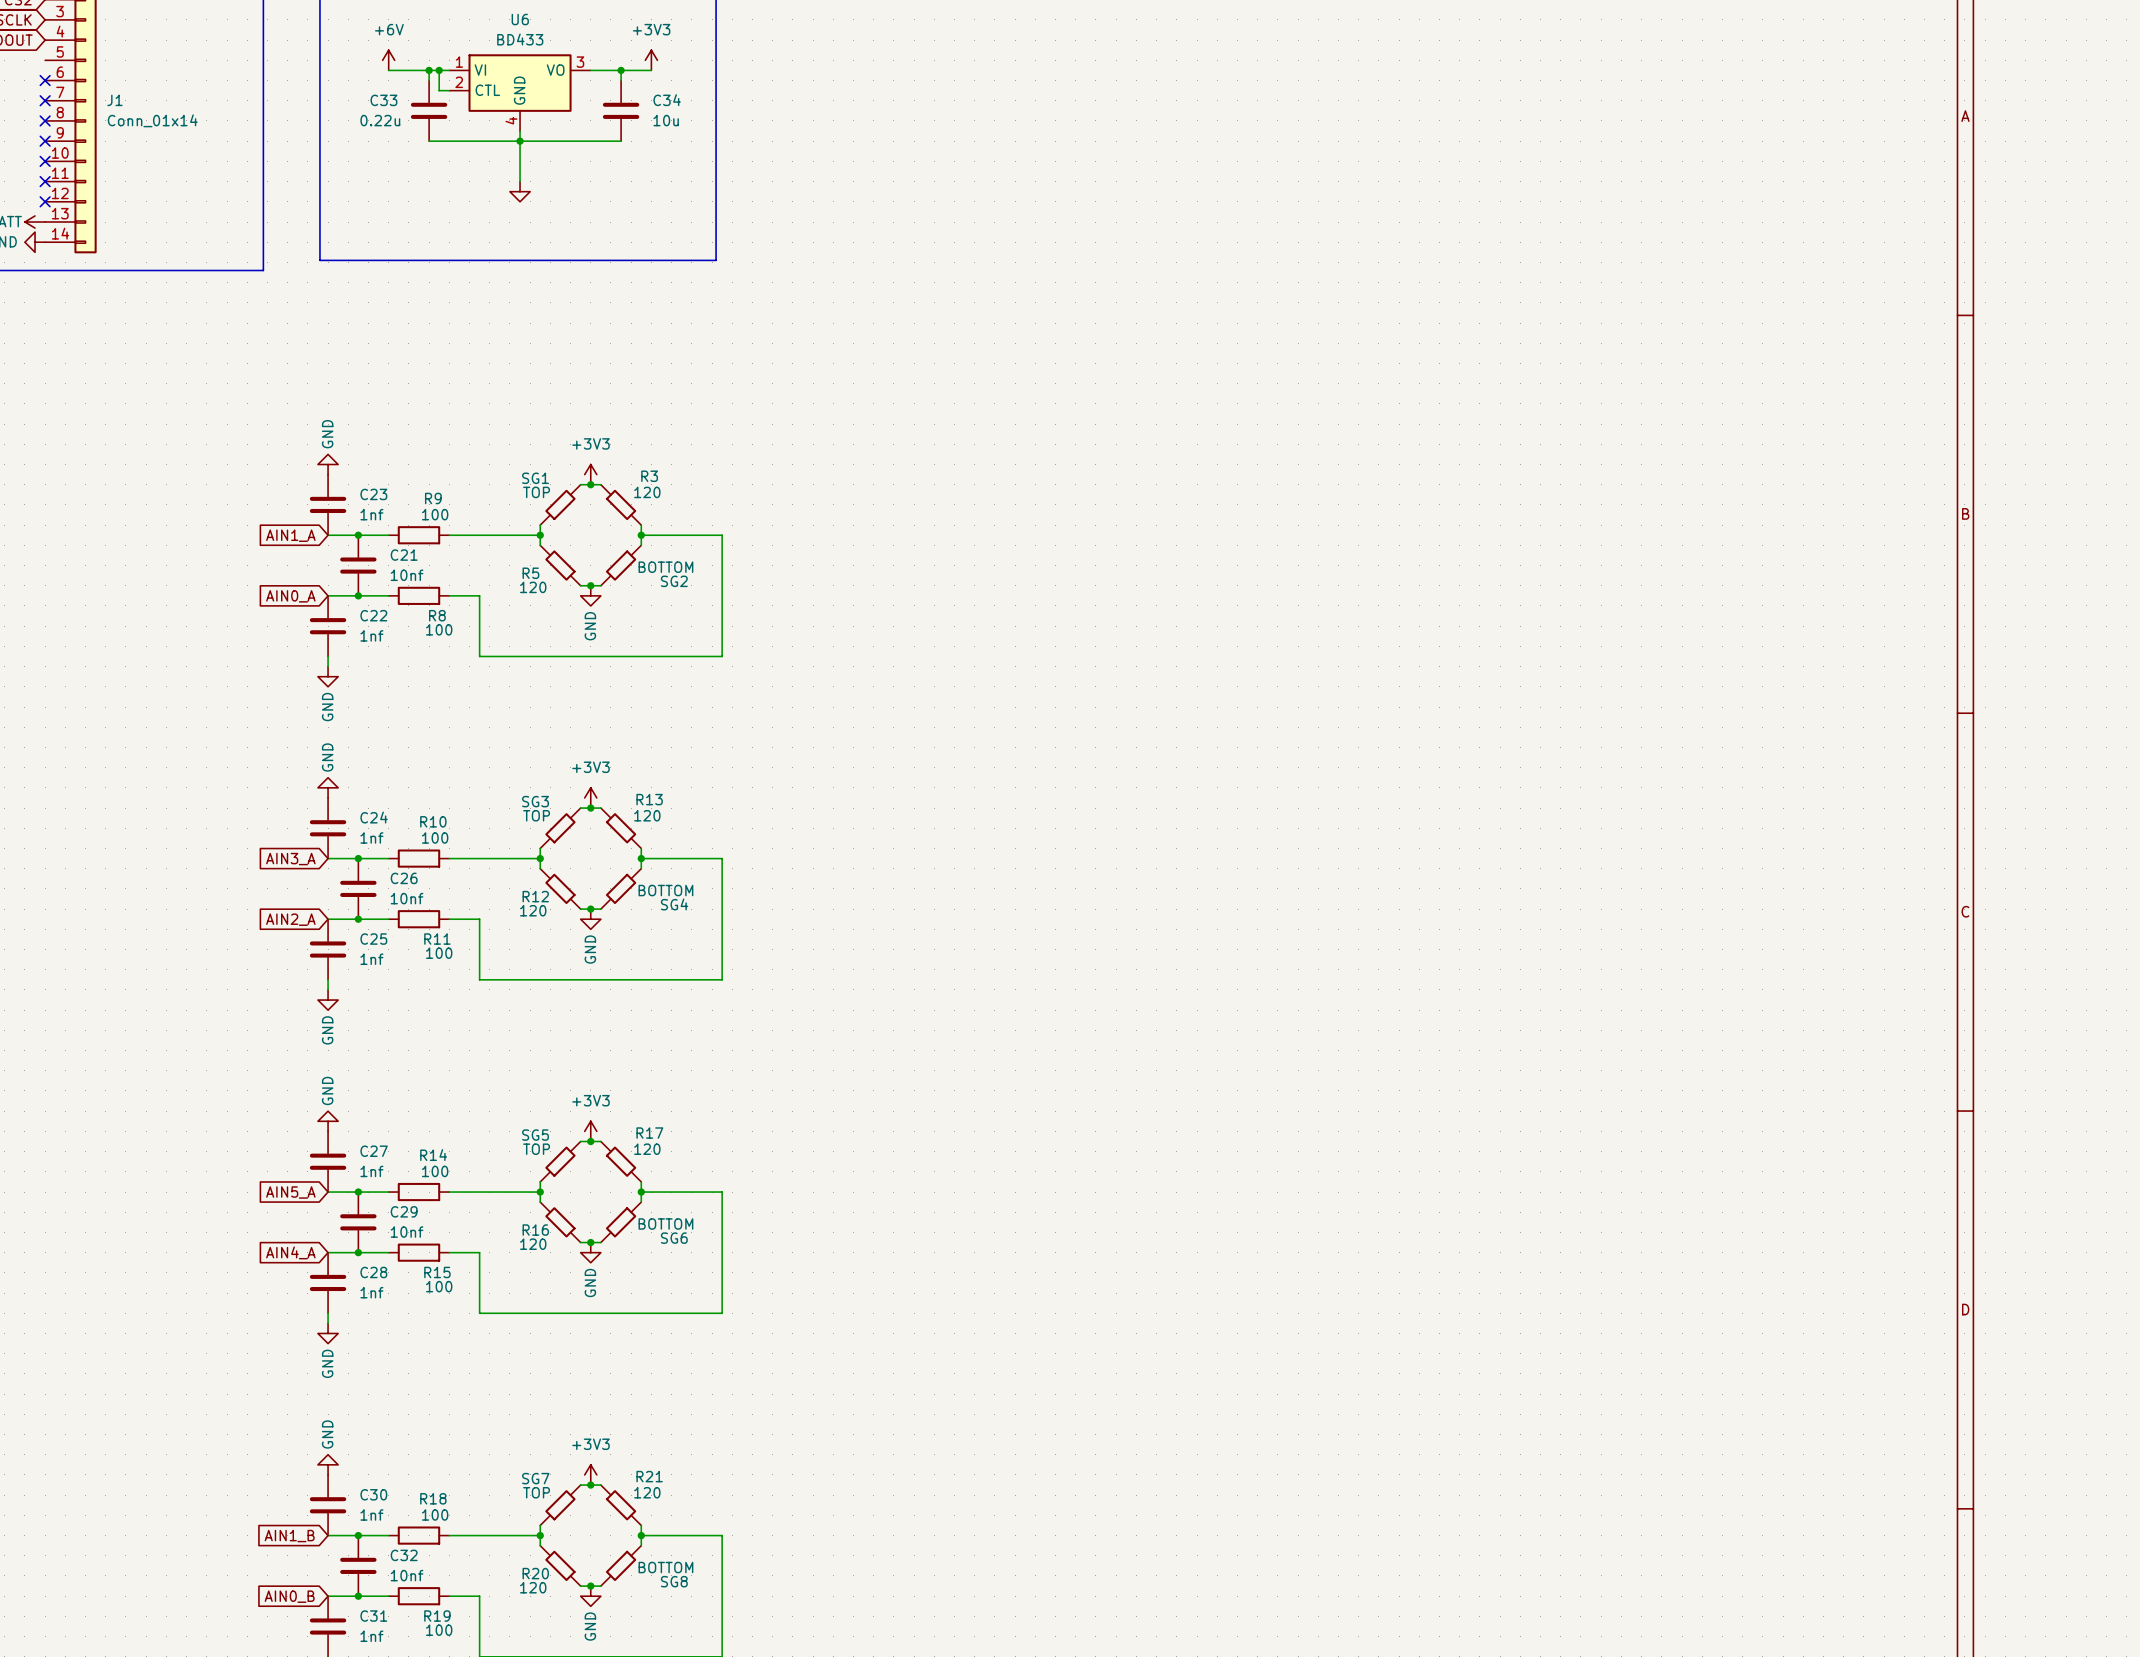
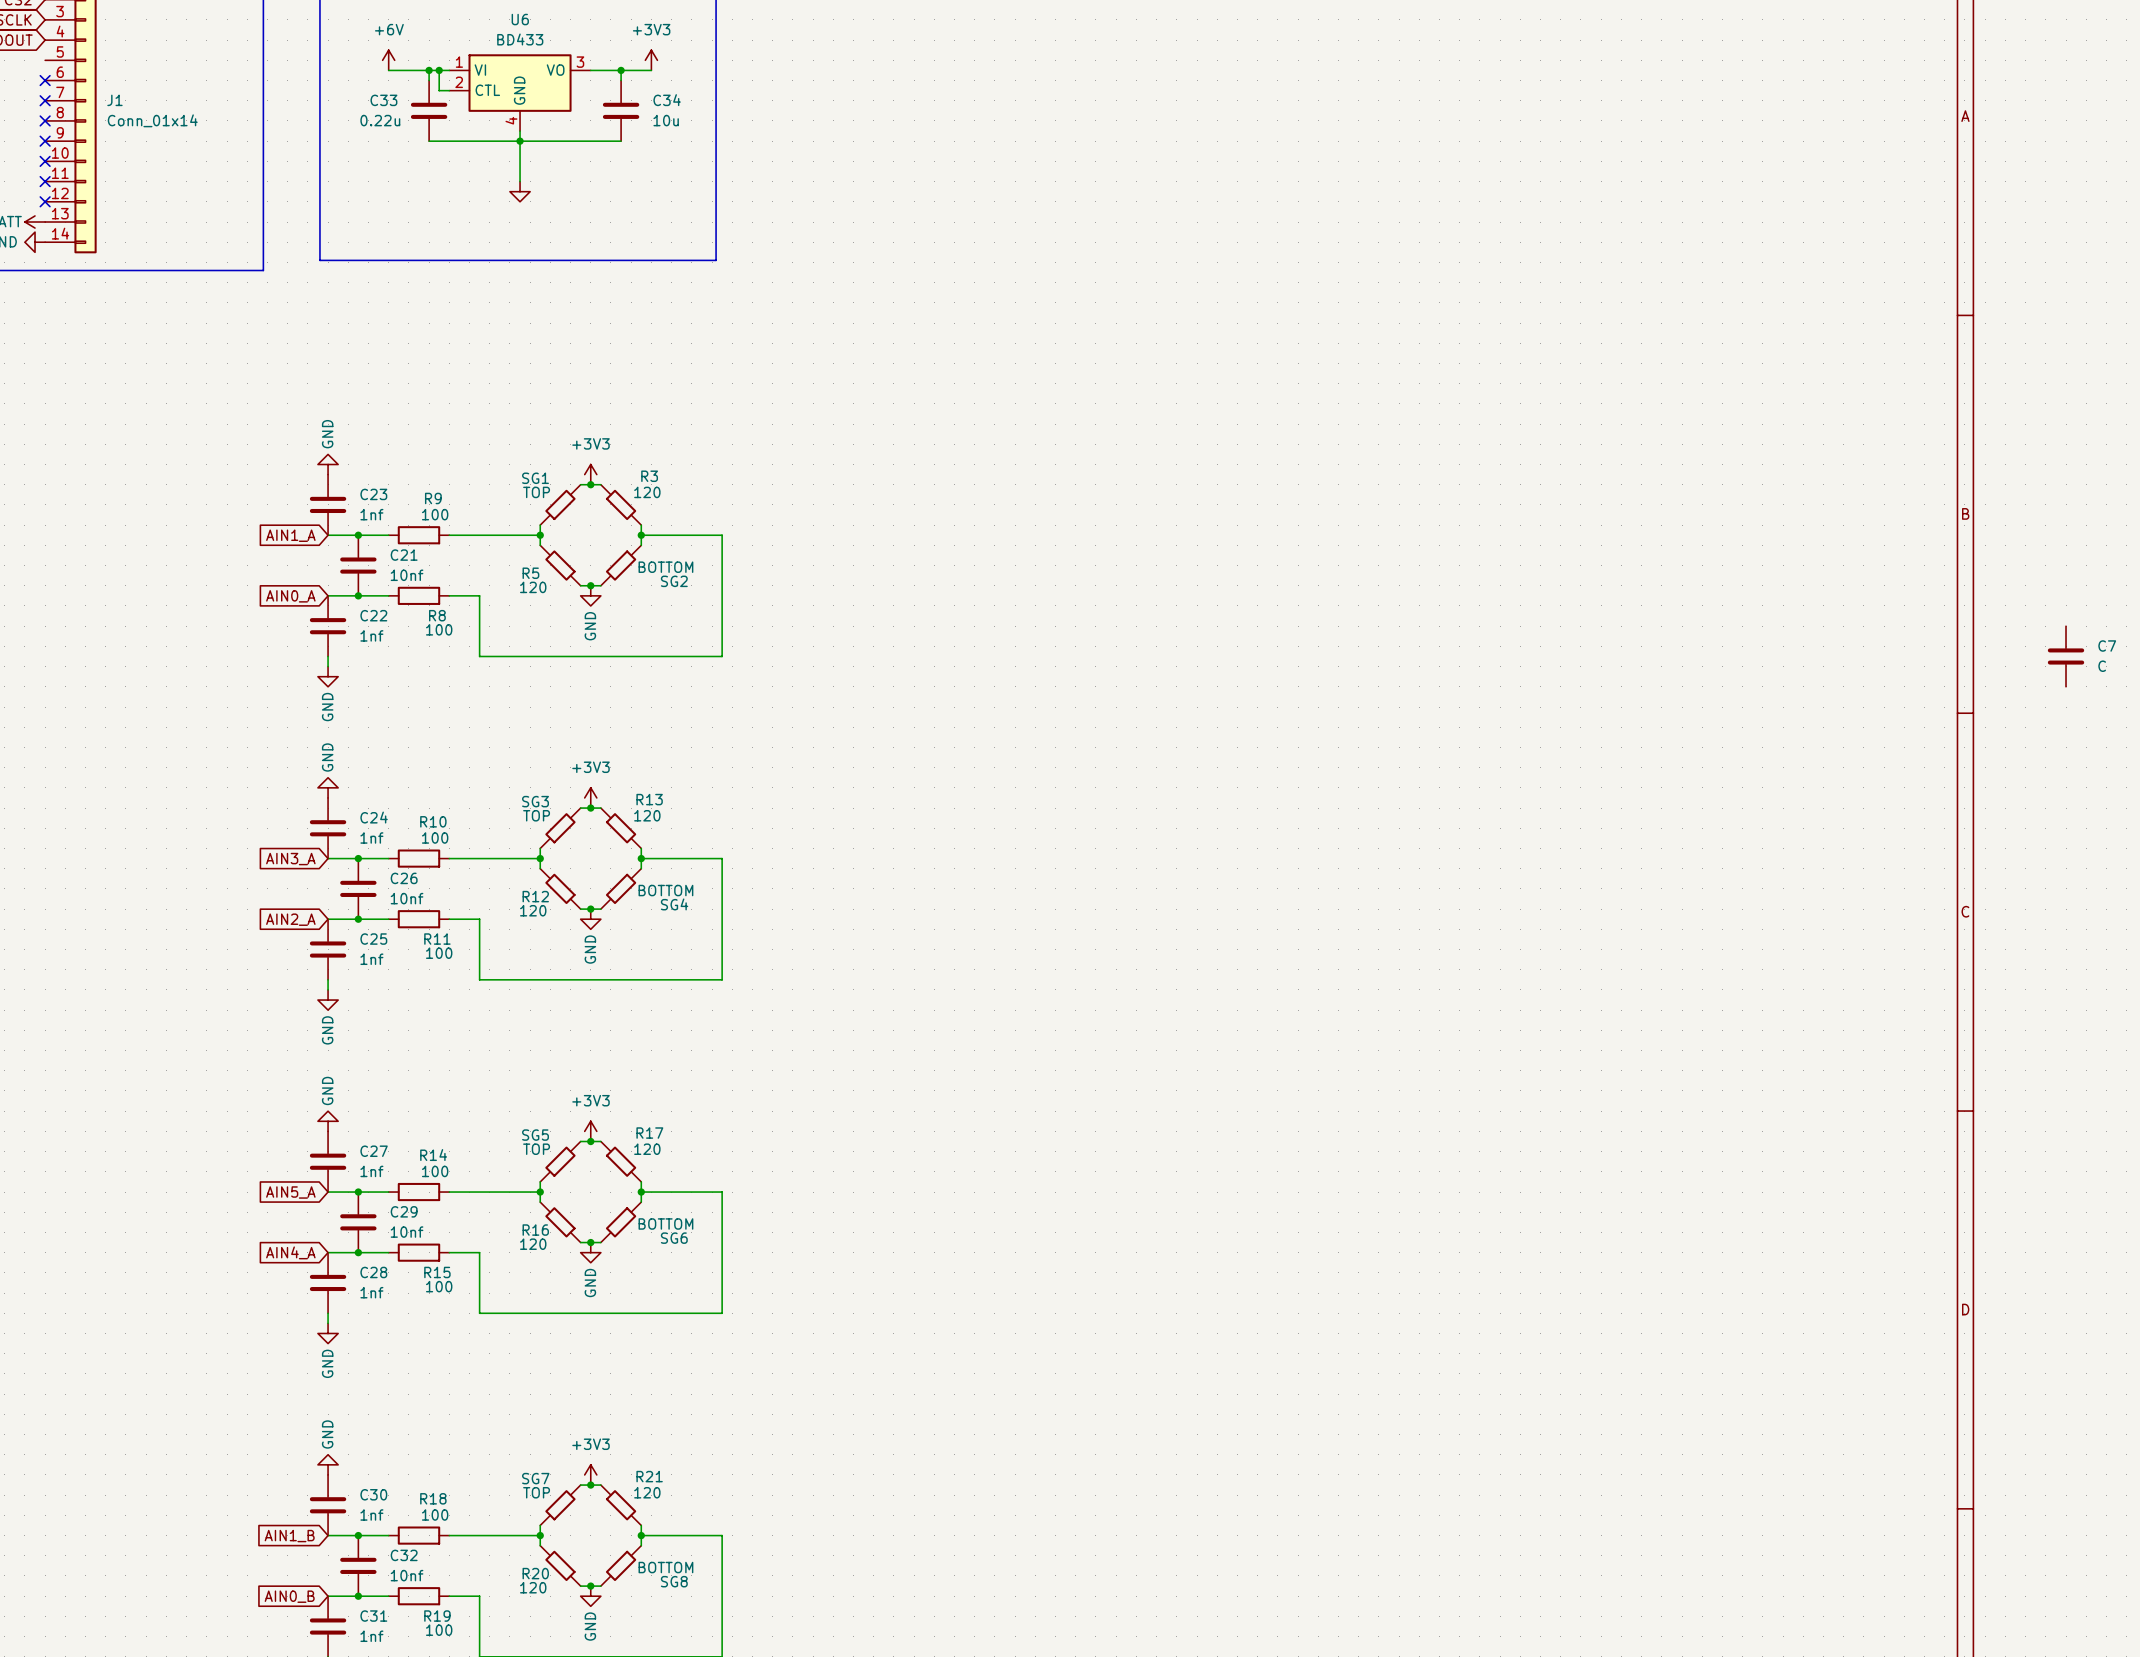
C7: none -> C (2066, 656)

